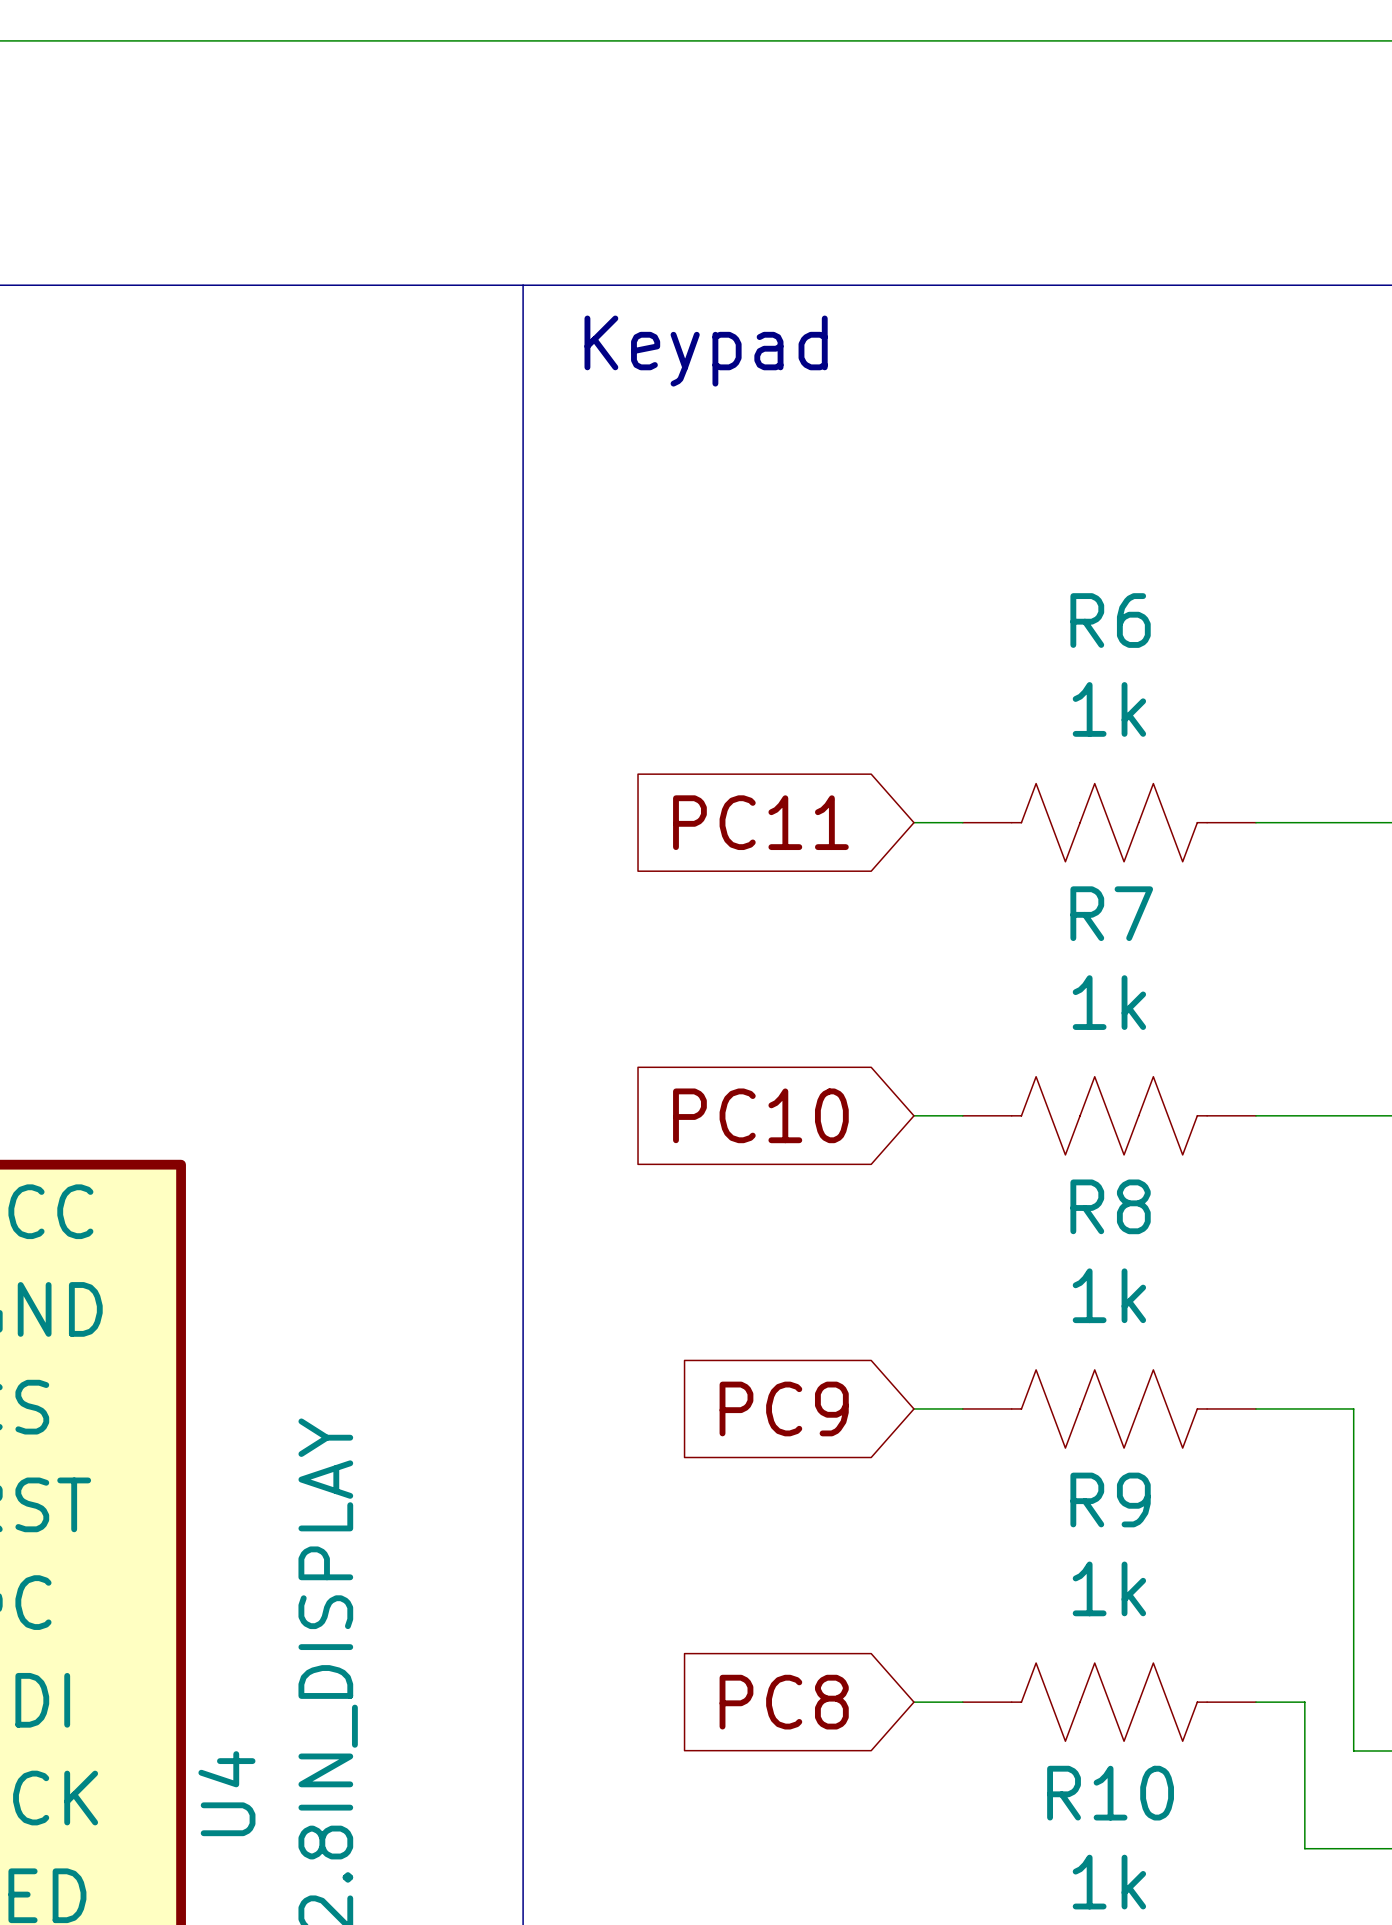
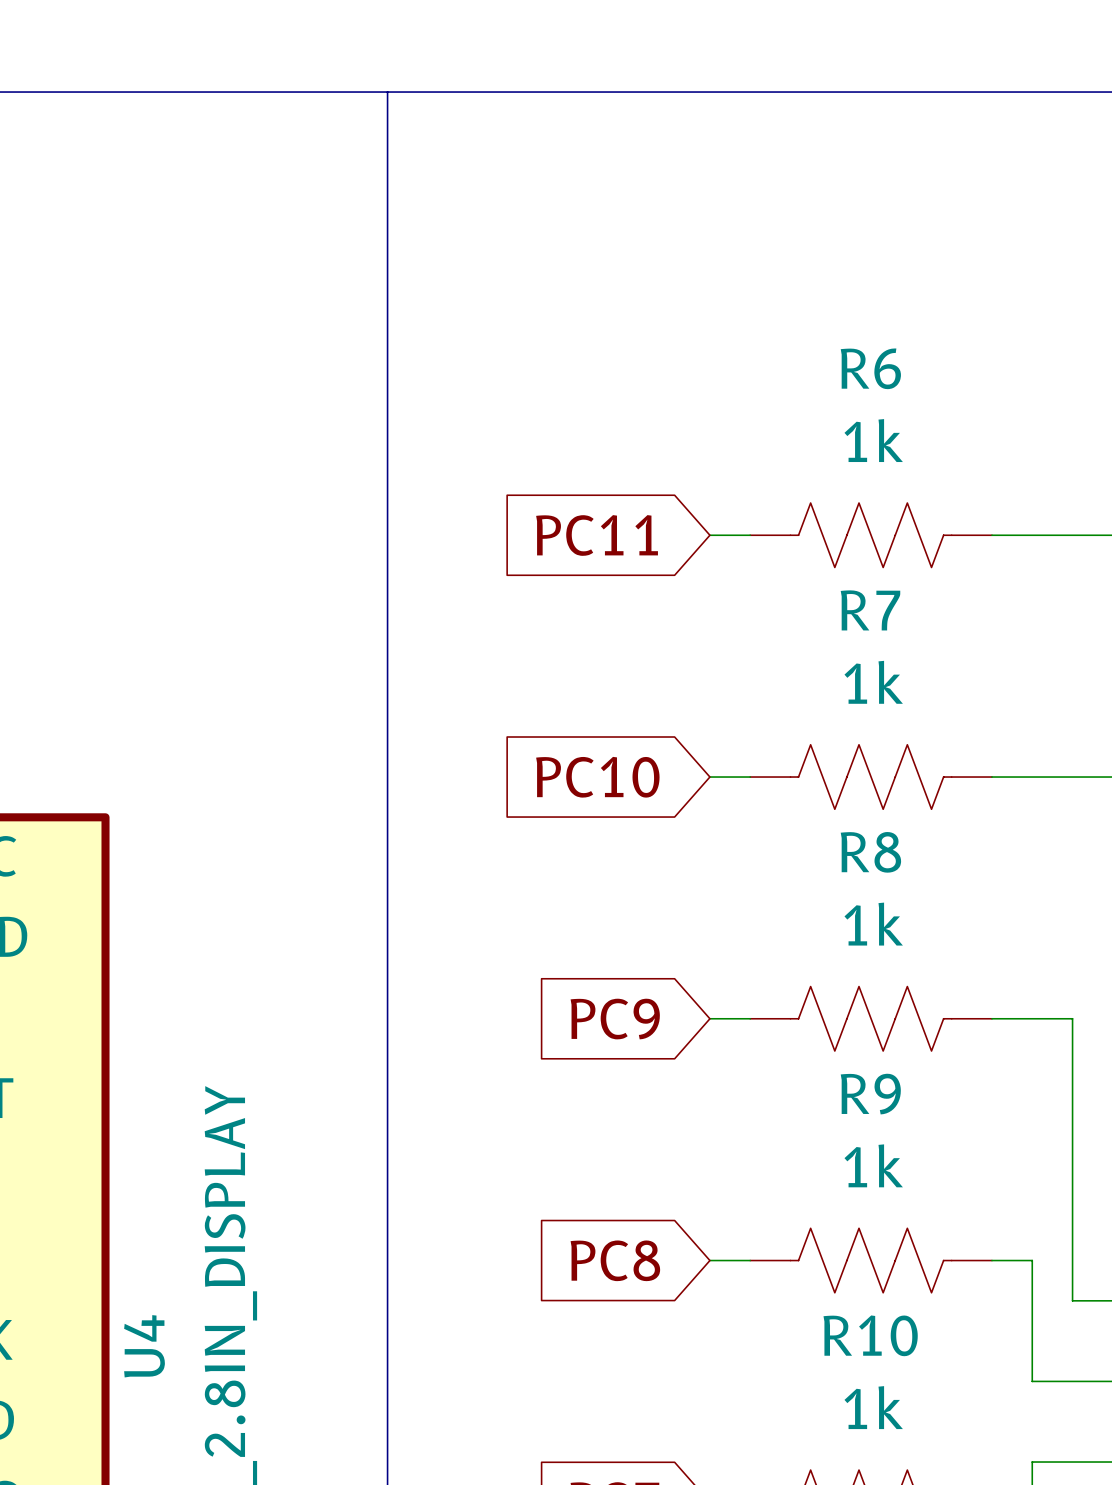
text: Keypad (706, 351) -> none

